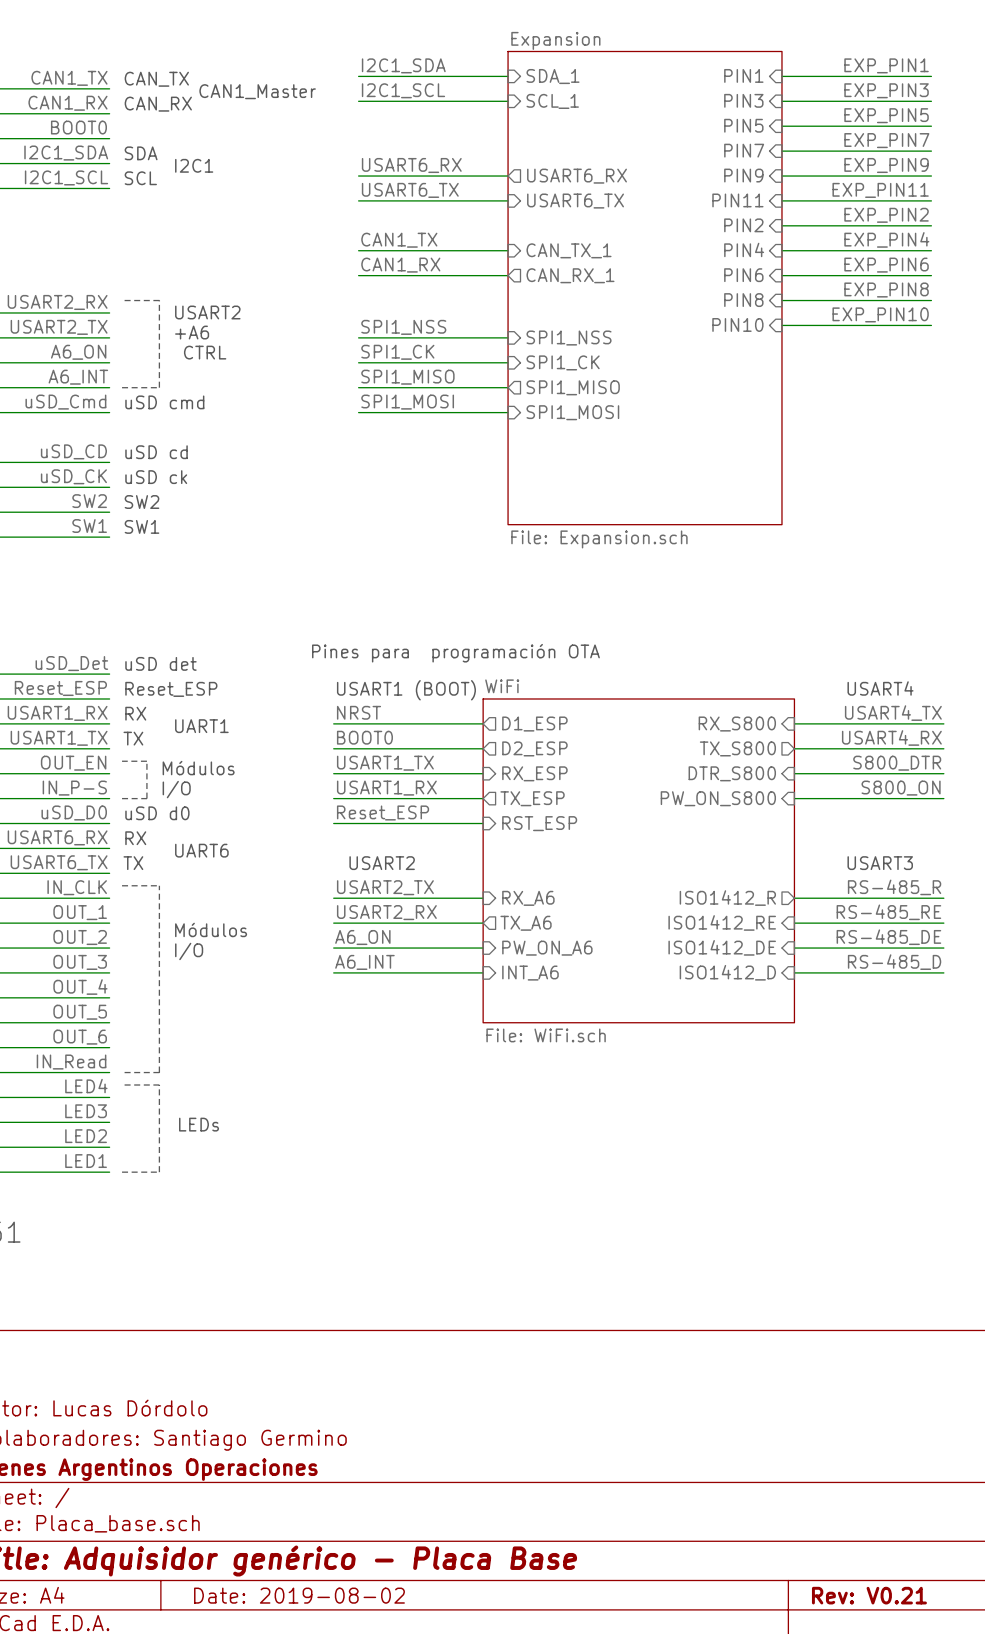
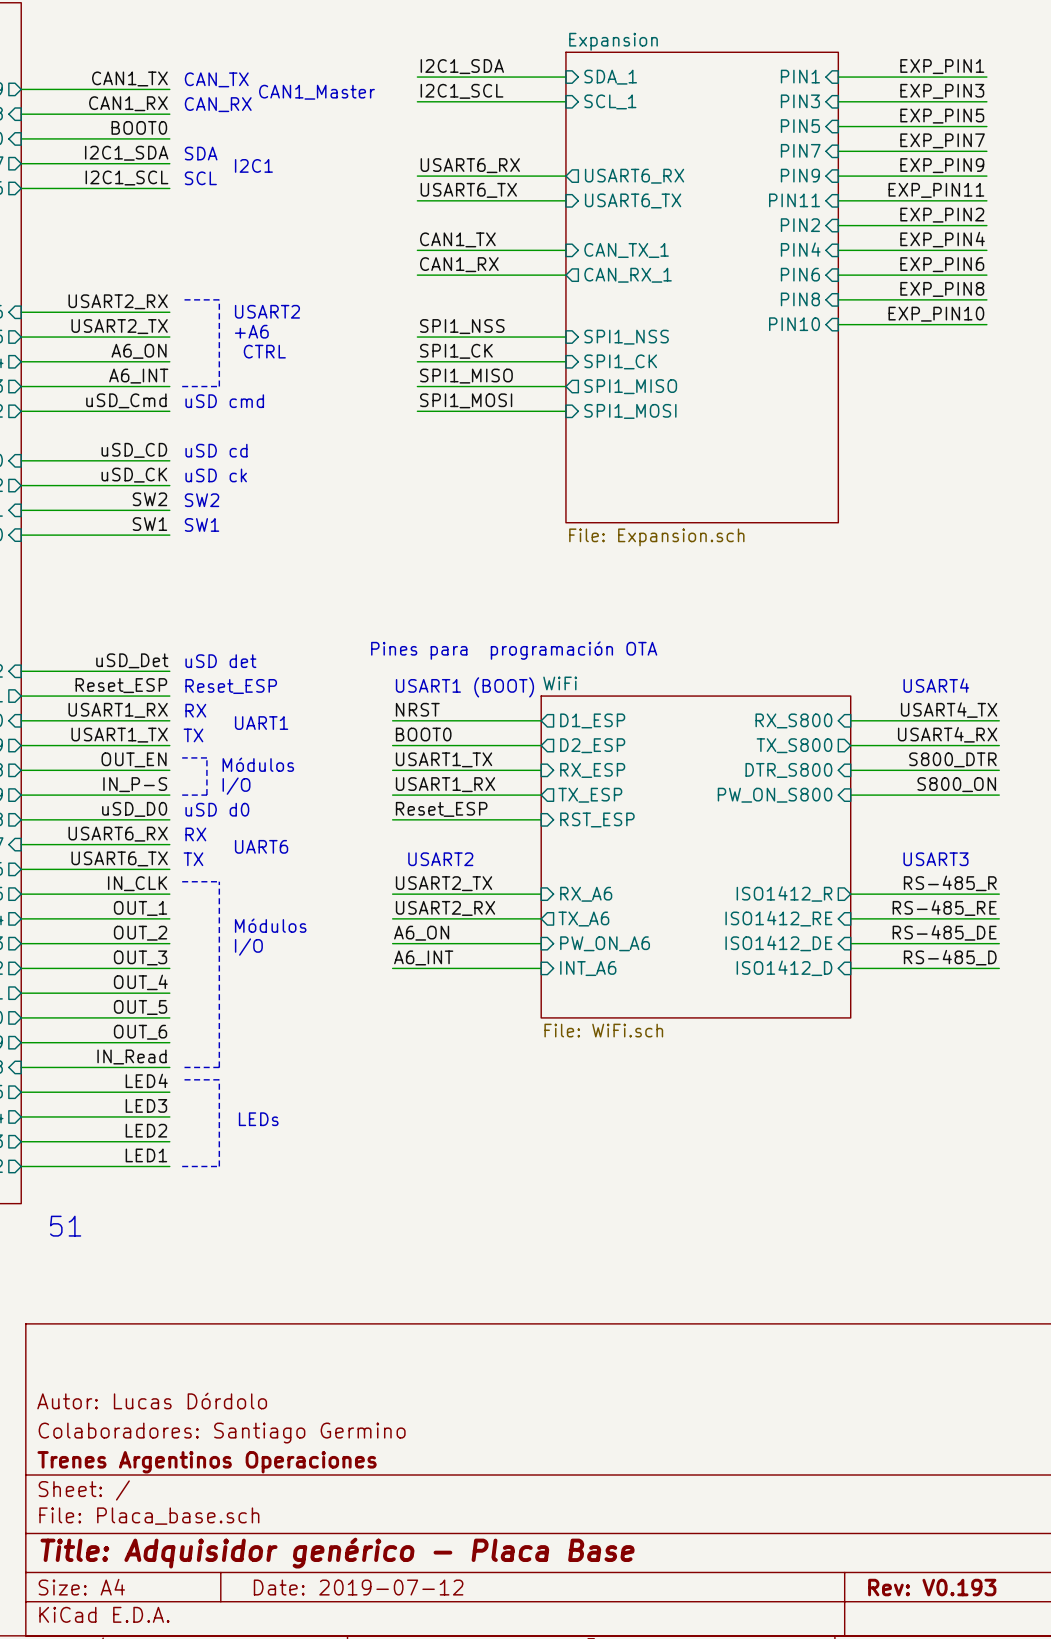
title block: Date: 2019-08-02 (299, 1595) -> Date: 2019-07-12 (358, 1587)
title block: Rev: V0.21 (869, 1595) -> Rev: V0.193 (932, 1587)

